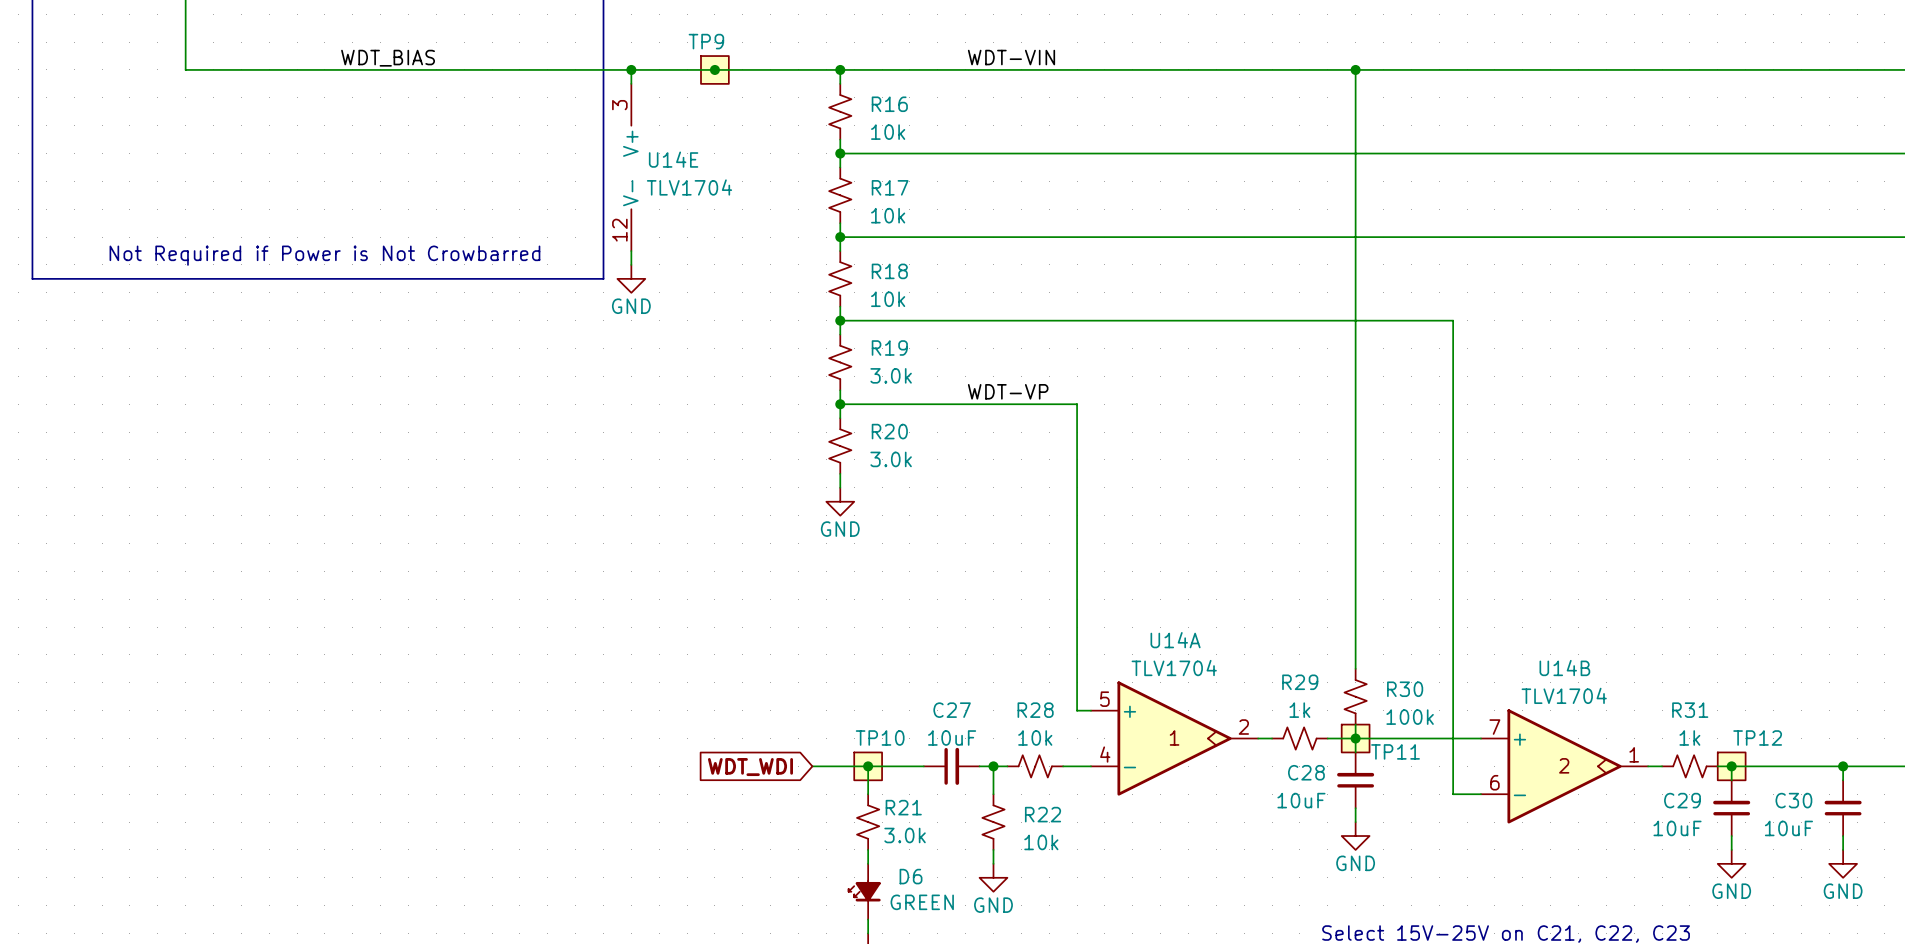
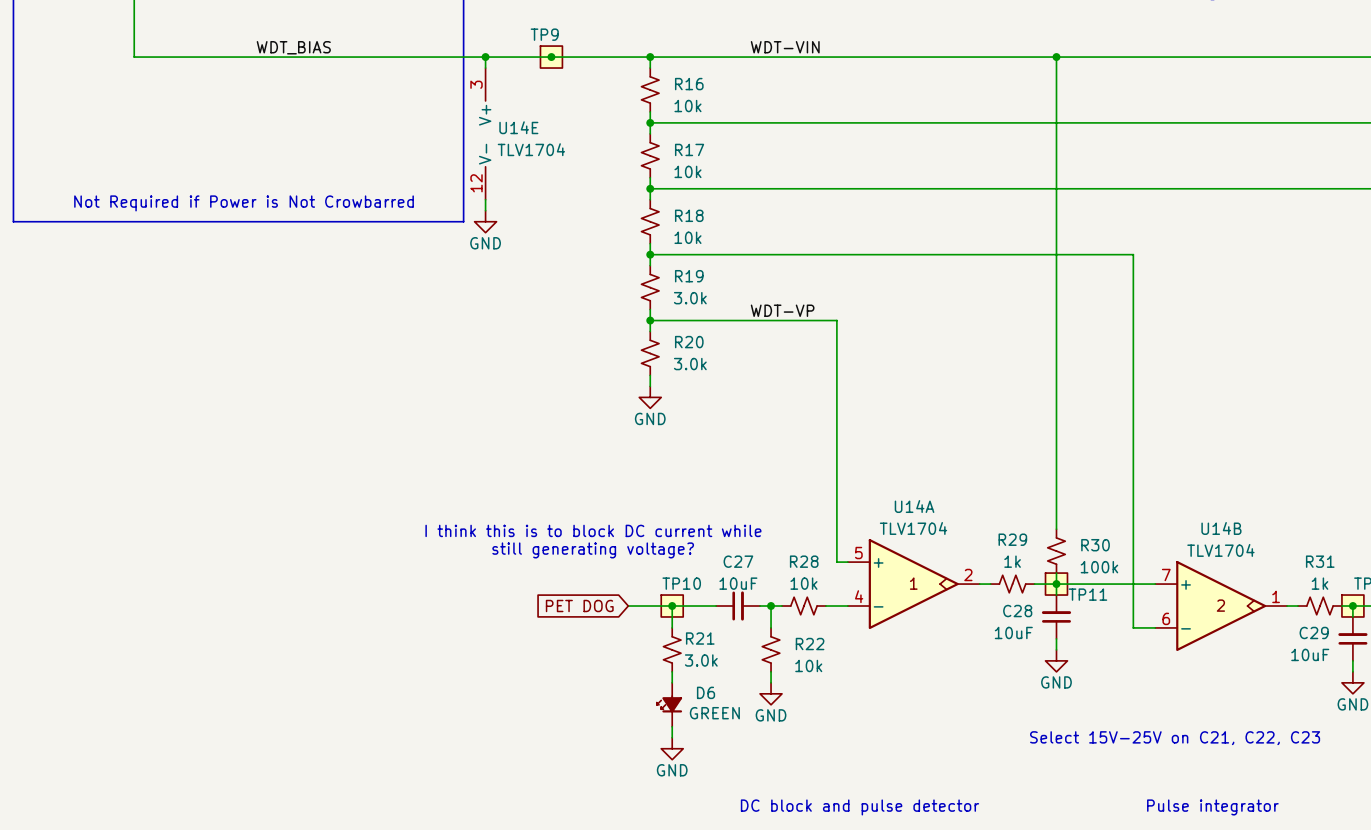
text: none -> I think this is to block DC current while (593, 530)
text: none -> still generating voltage? (593, 550)
global label: WDT_WDI (750, 767) -> PET DOG (579, 606)

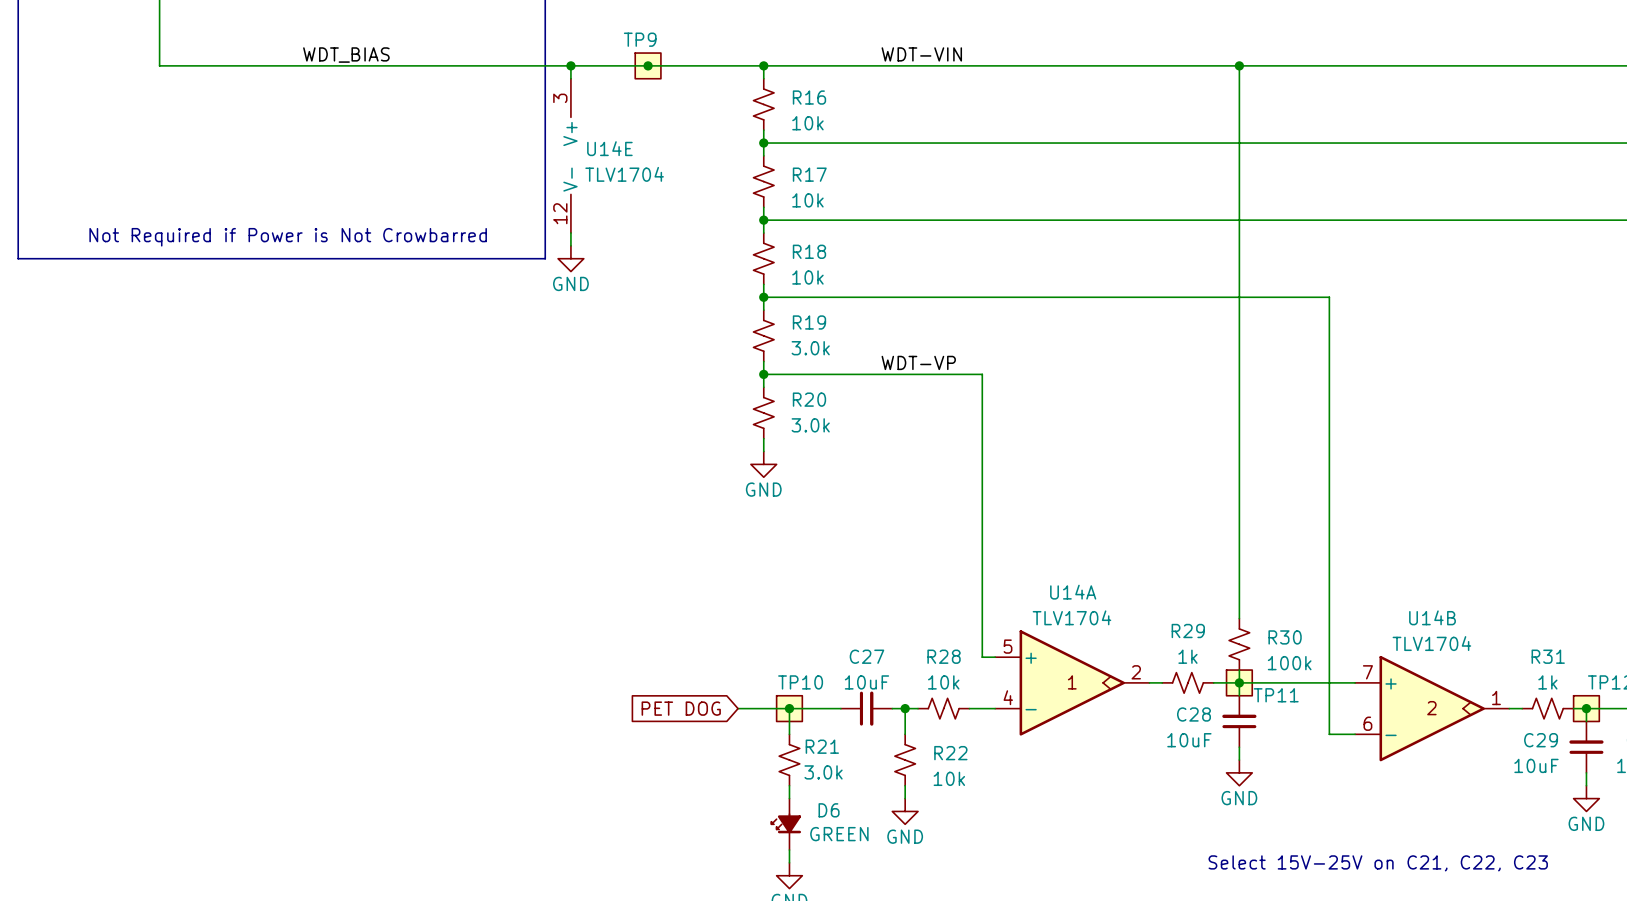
text: I think this is to block DC current while (593, 530) -> none
text: still generating voltage? (593, 550) -> none

